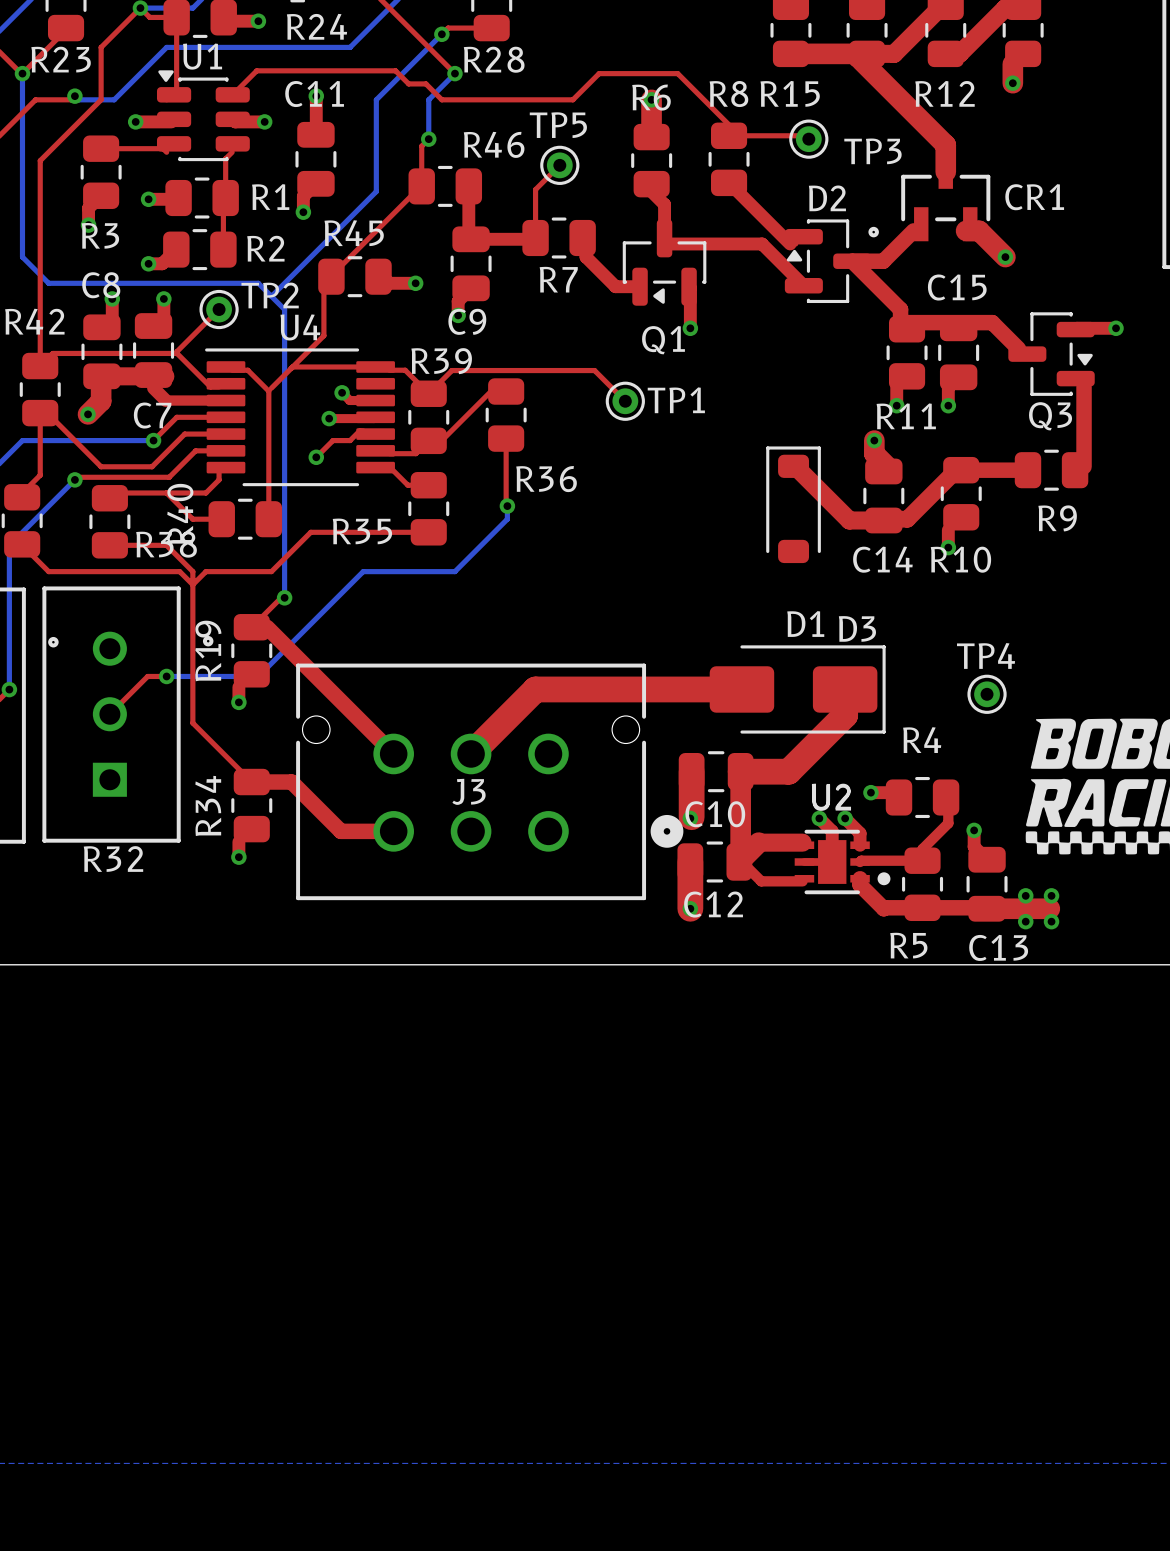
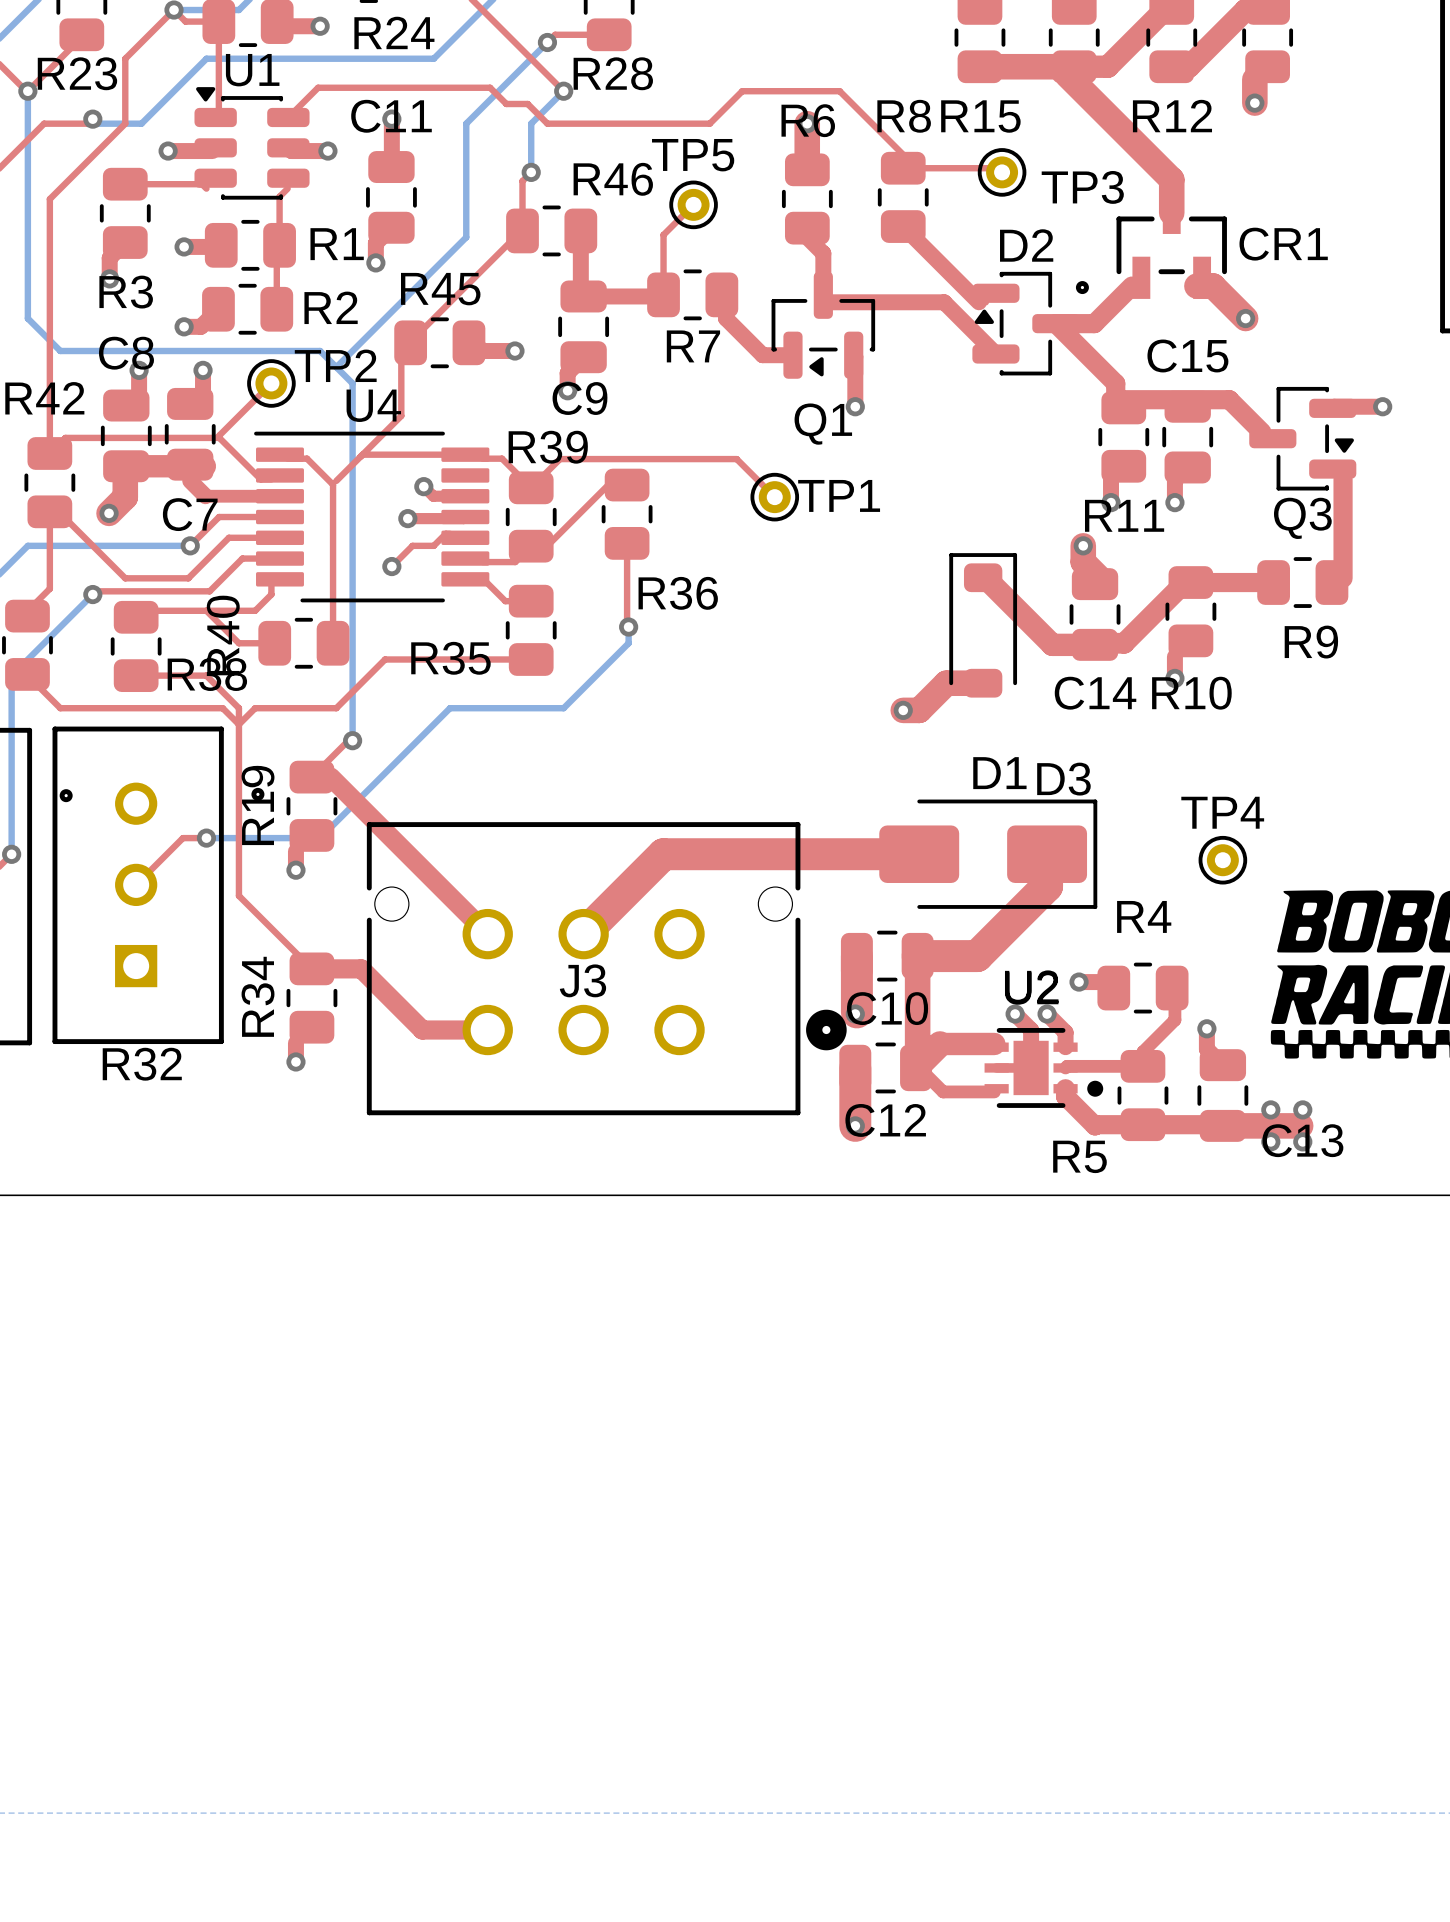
top track: none -> (983, 683) (946, 683) (919, 710) (903, 710)
via: none -> (903, 710)
R5 name position: R5 (908, 945) -> R5 (1079, 1156)
C13 name position: C13 (998, 947) -> C13 (1302, 1140)

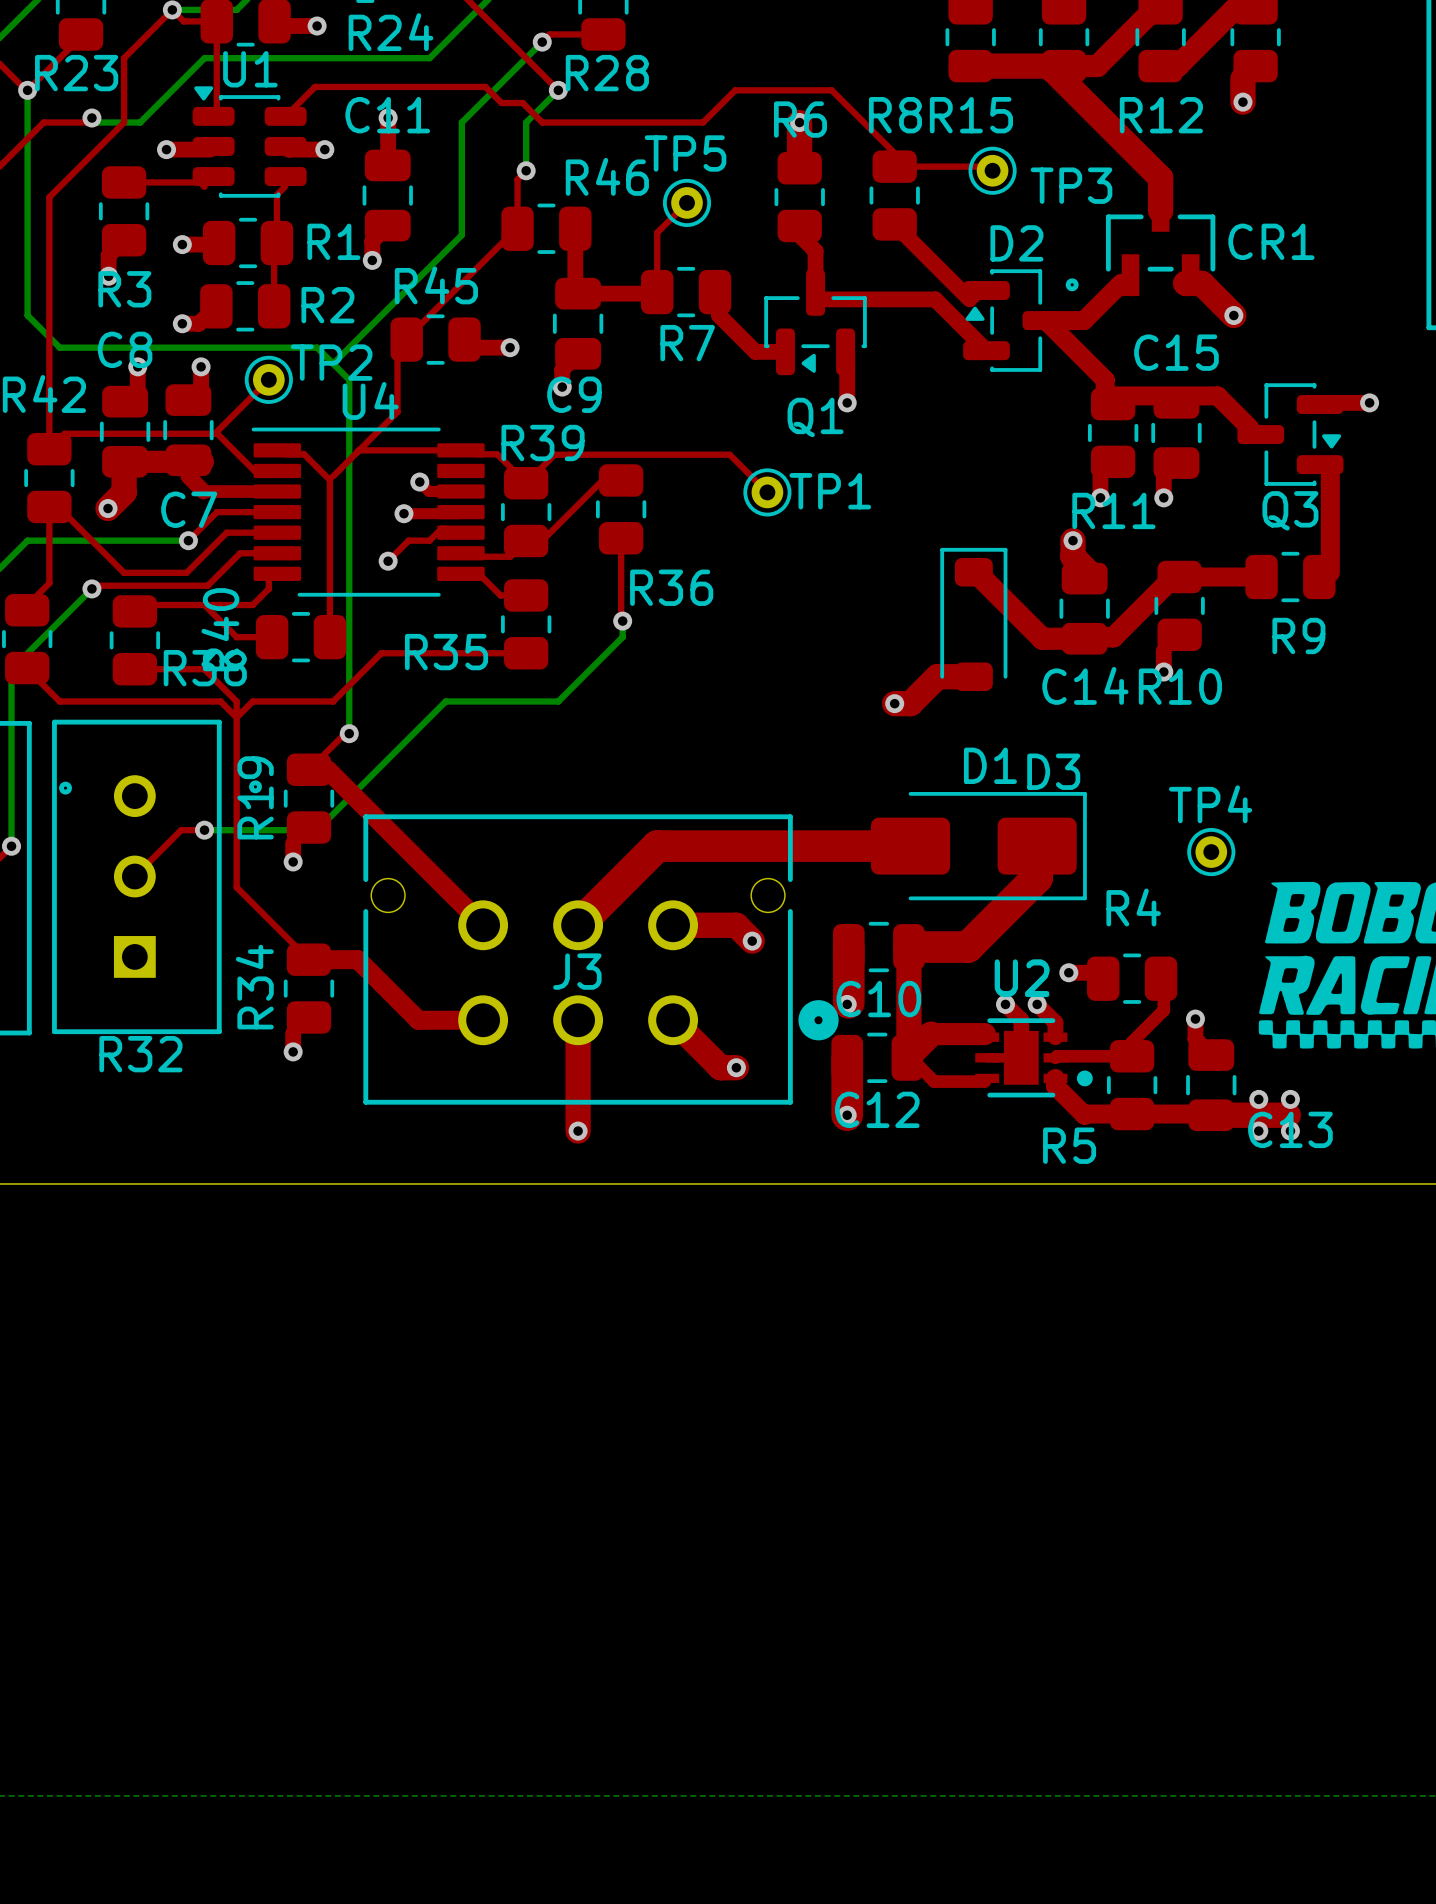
top track: none -> (673, 925) (736, 925) (752, 941)
via: none -> (752, 941)
top track: none -> (578, 1020) (578, 1131)
top track: none -> (673, 1020) (720, 1067) (736, 1067)
via: none -> (736, 1067)
via: none -> (578, 1131)

